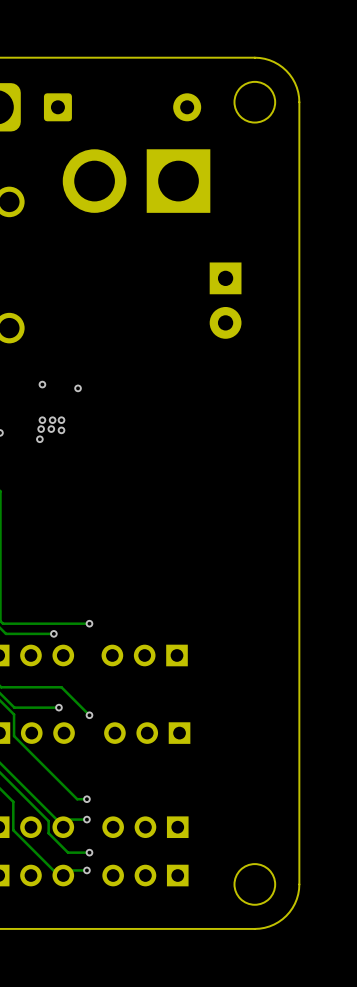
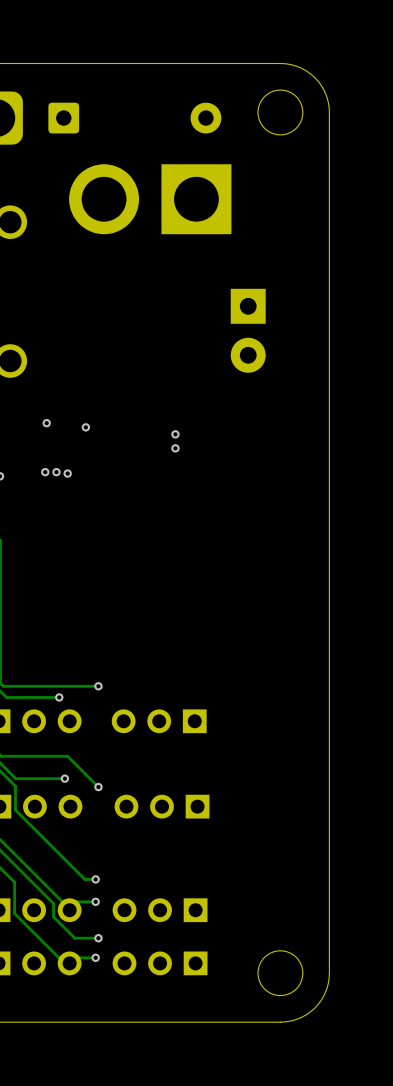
via: none -> (175, 434)
via: none -> (175, 448)
via: (42, 420) -> none
via: (52, 420) -> none
via: (61, 420) -> none
via: (39, 439) -> none

